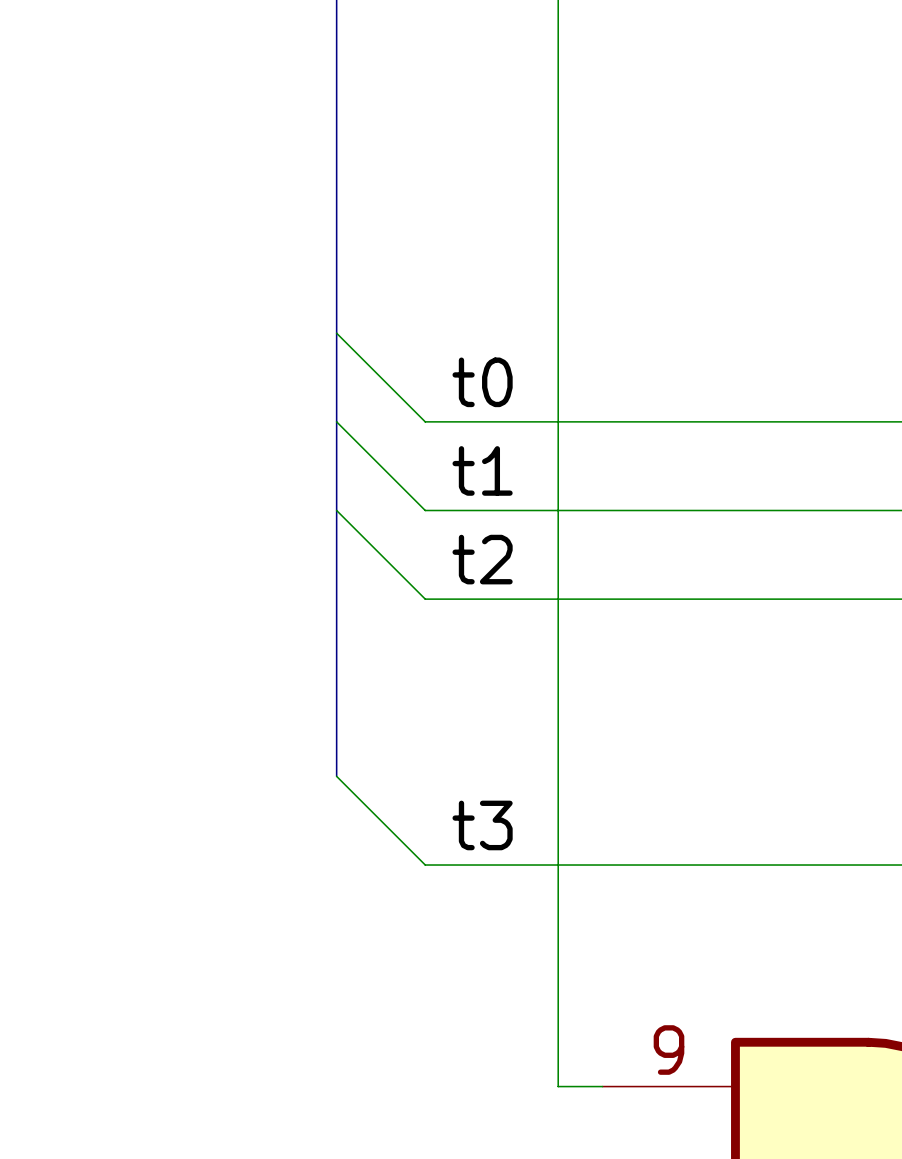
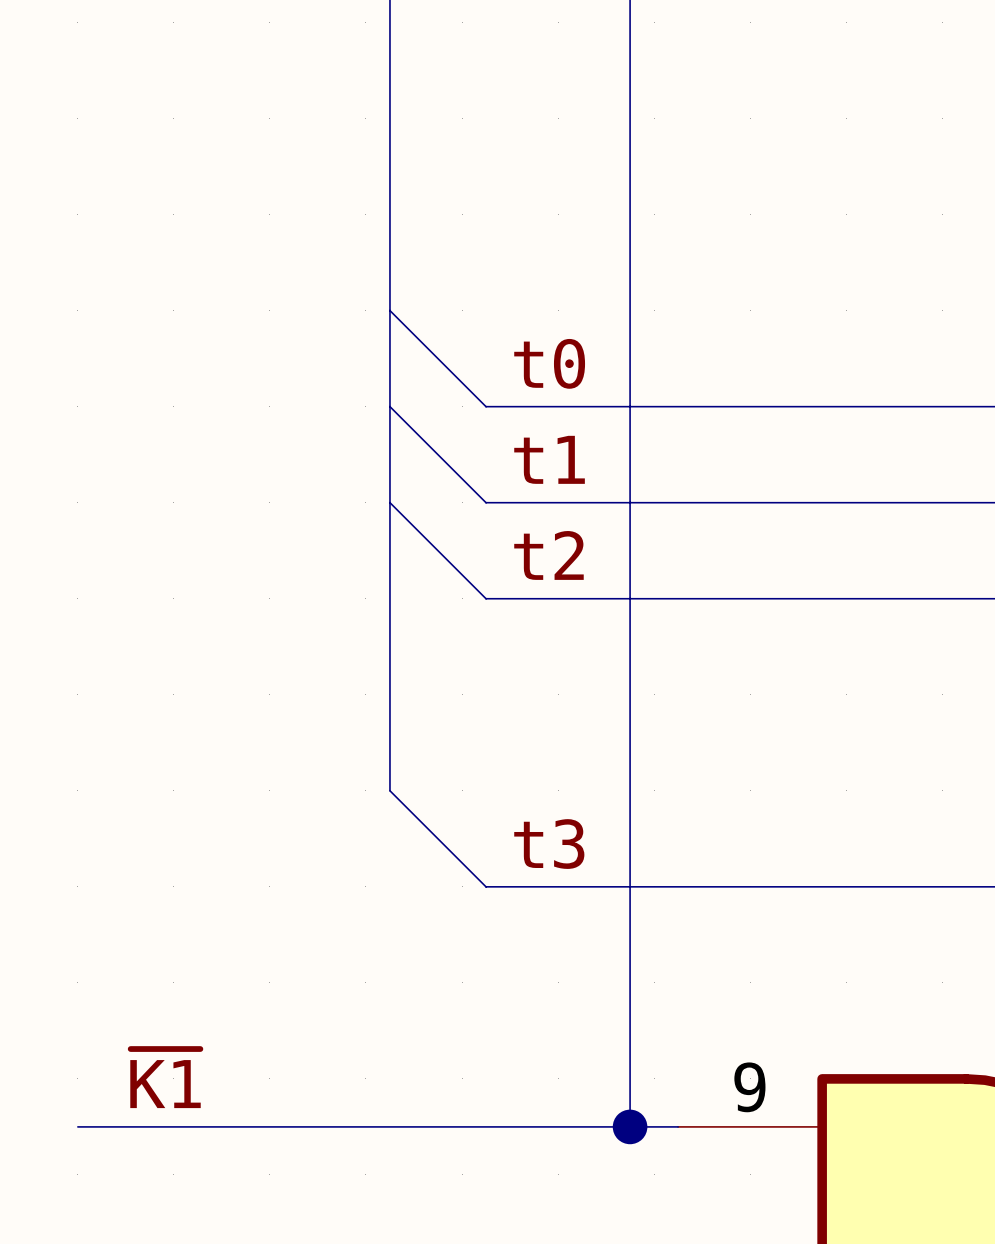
label: none -> ~{K1} (165, 1078)
wire: none -> (77, 1126) (630, 1126)
junction: none -> (630, 1126)

